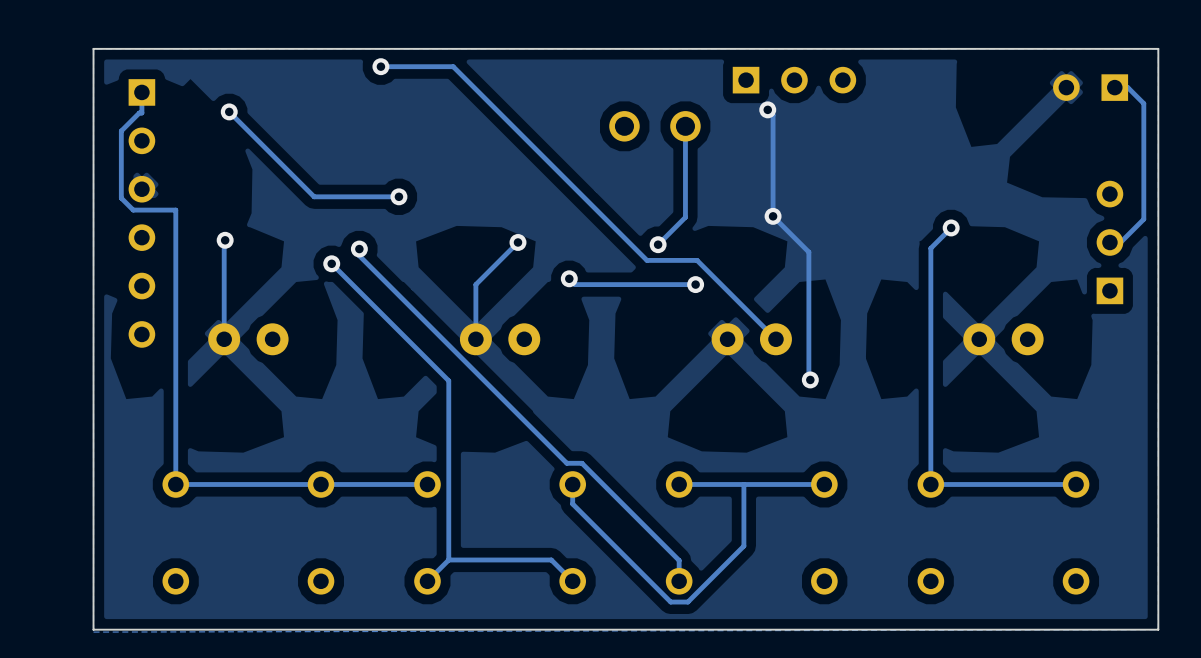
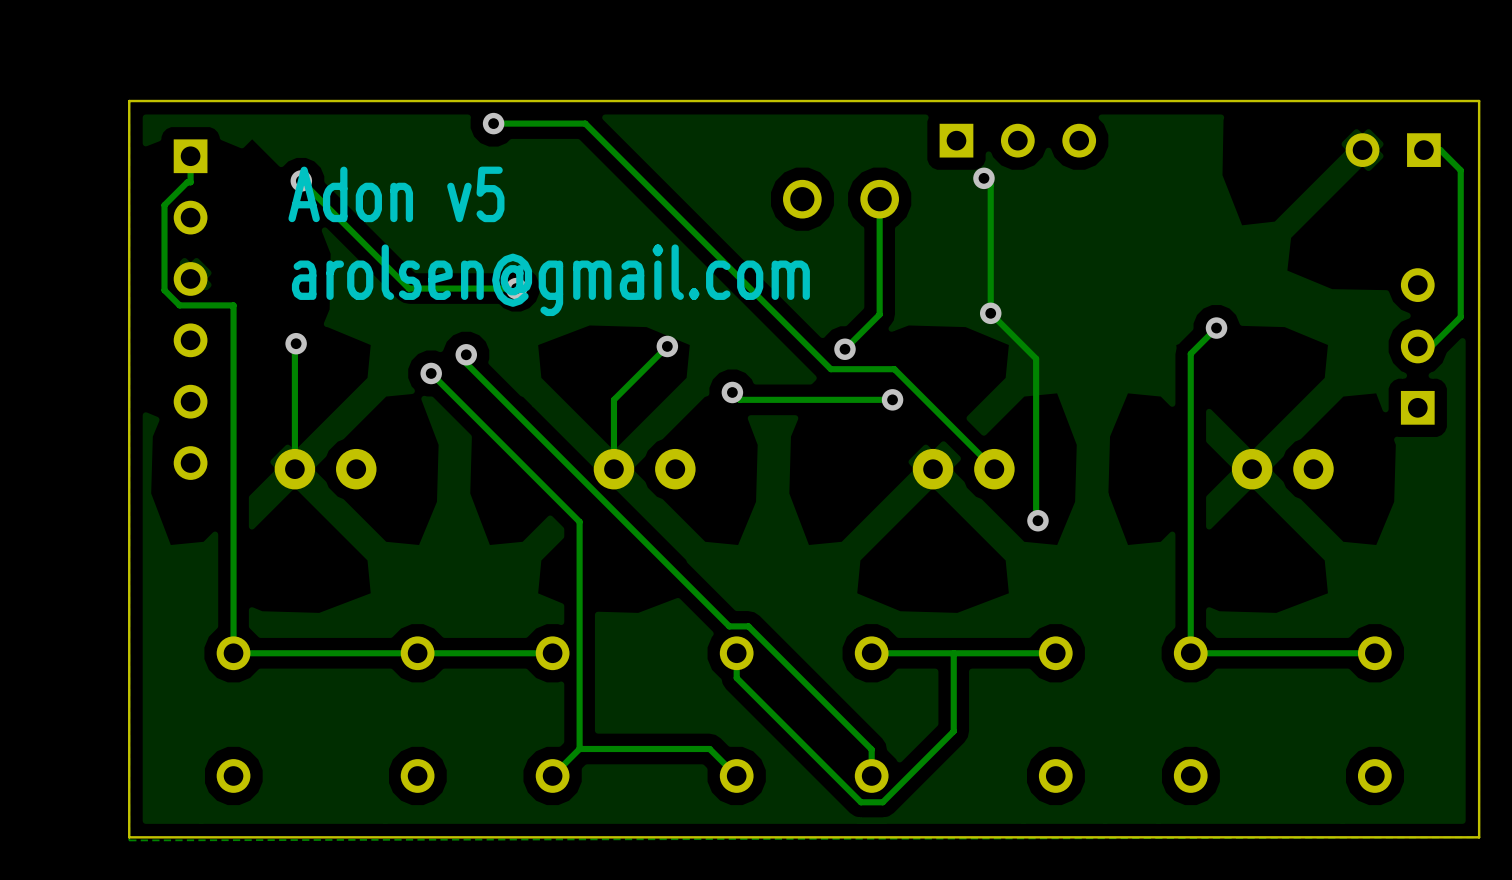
text: none -> Adon v5 (396, 194)
text: none -> arolsen@gmail.com (550, 280)

